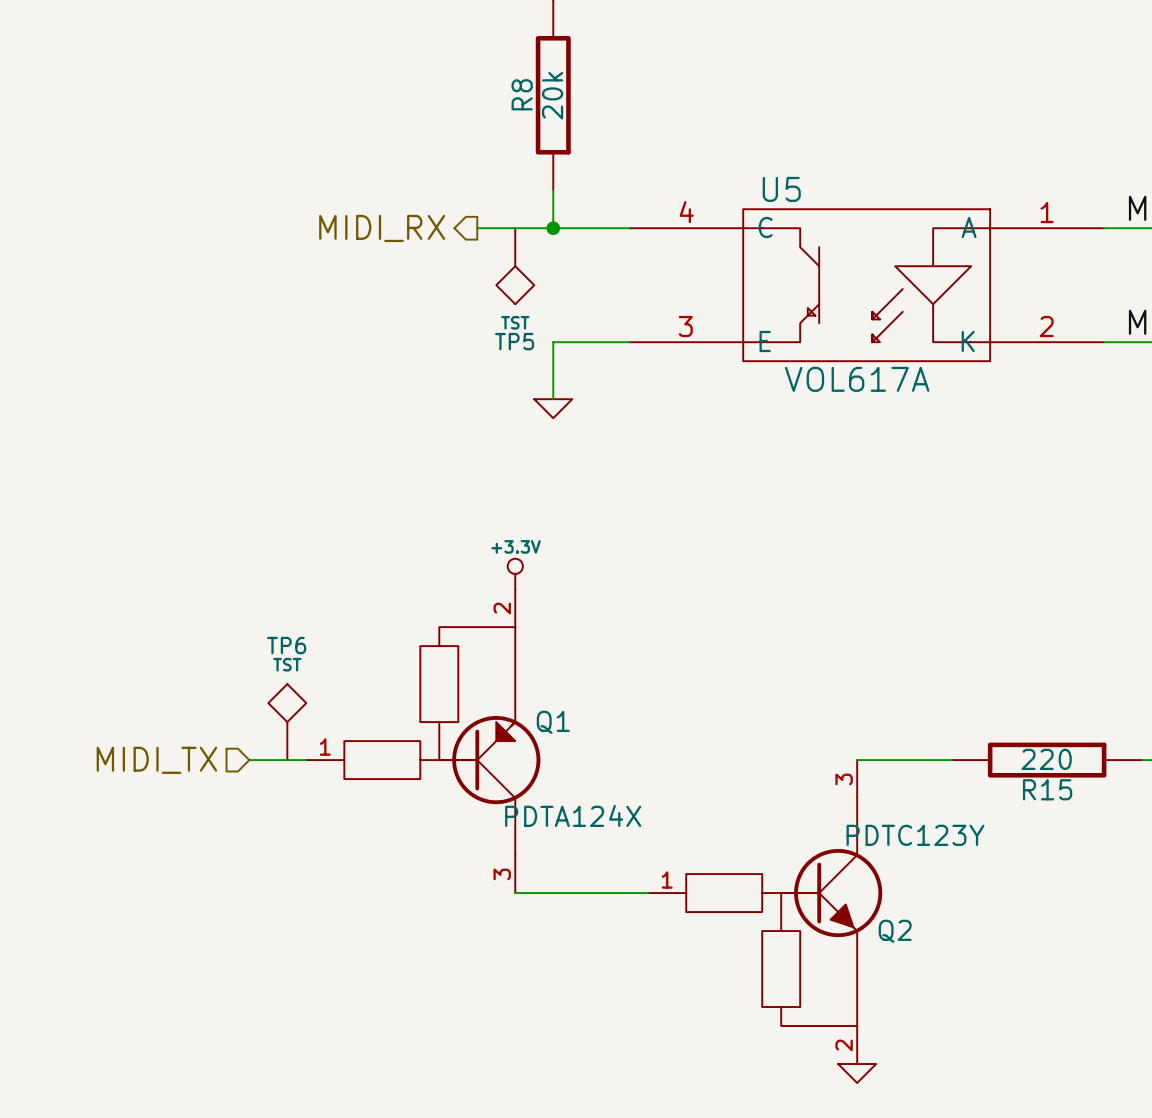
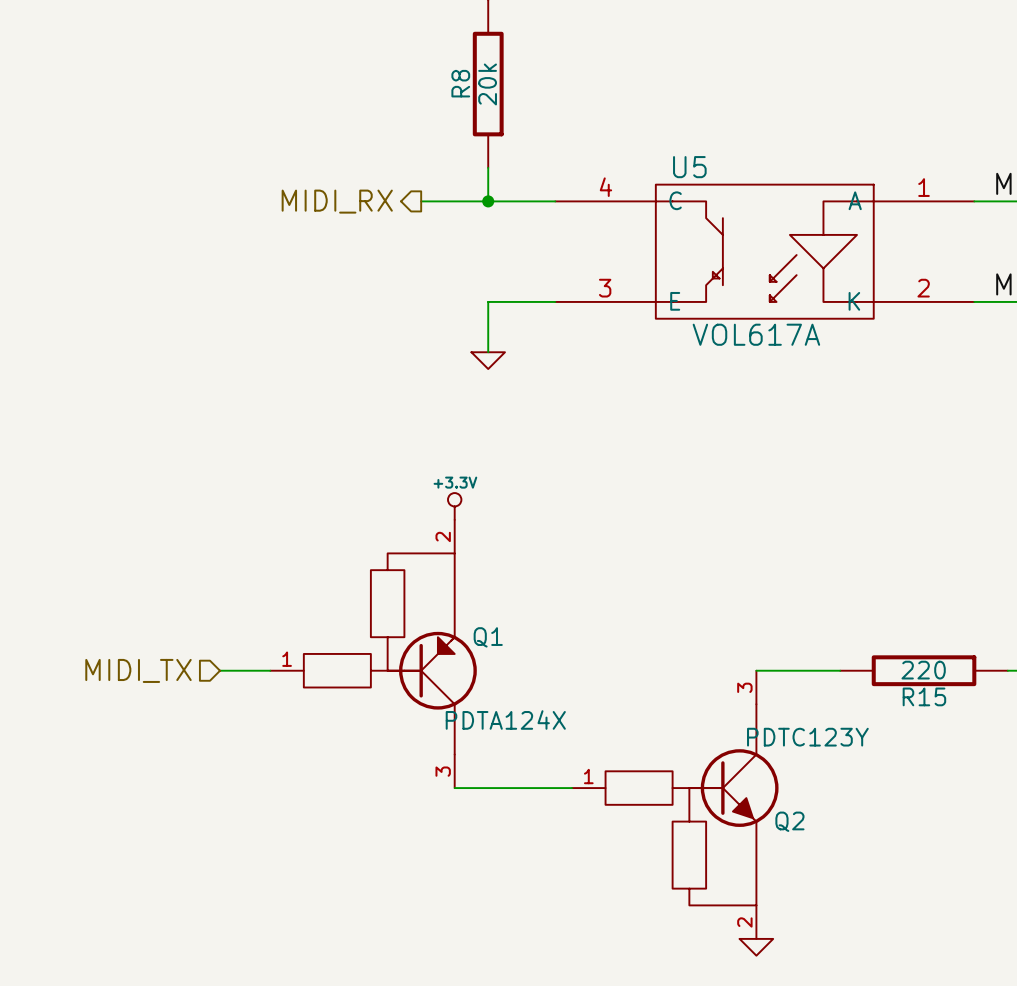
TP5: TST (515, 266) -> none
TP6: TST (287, 722) -> none

